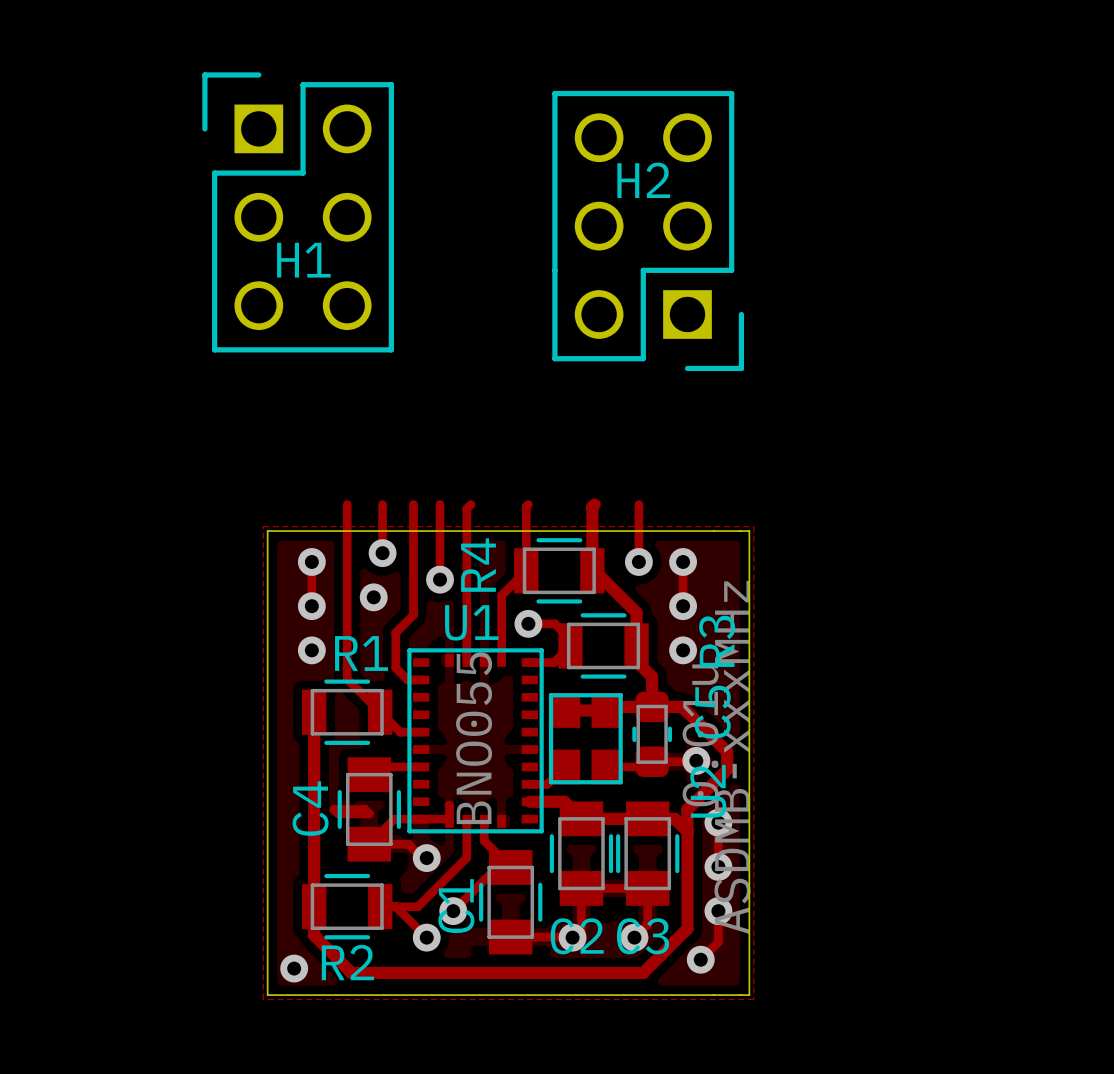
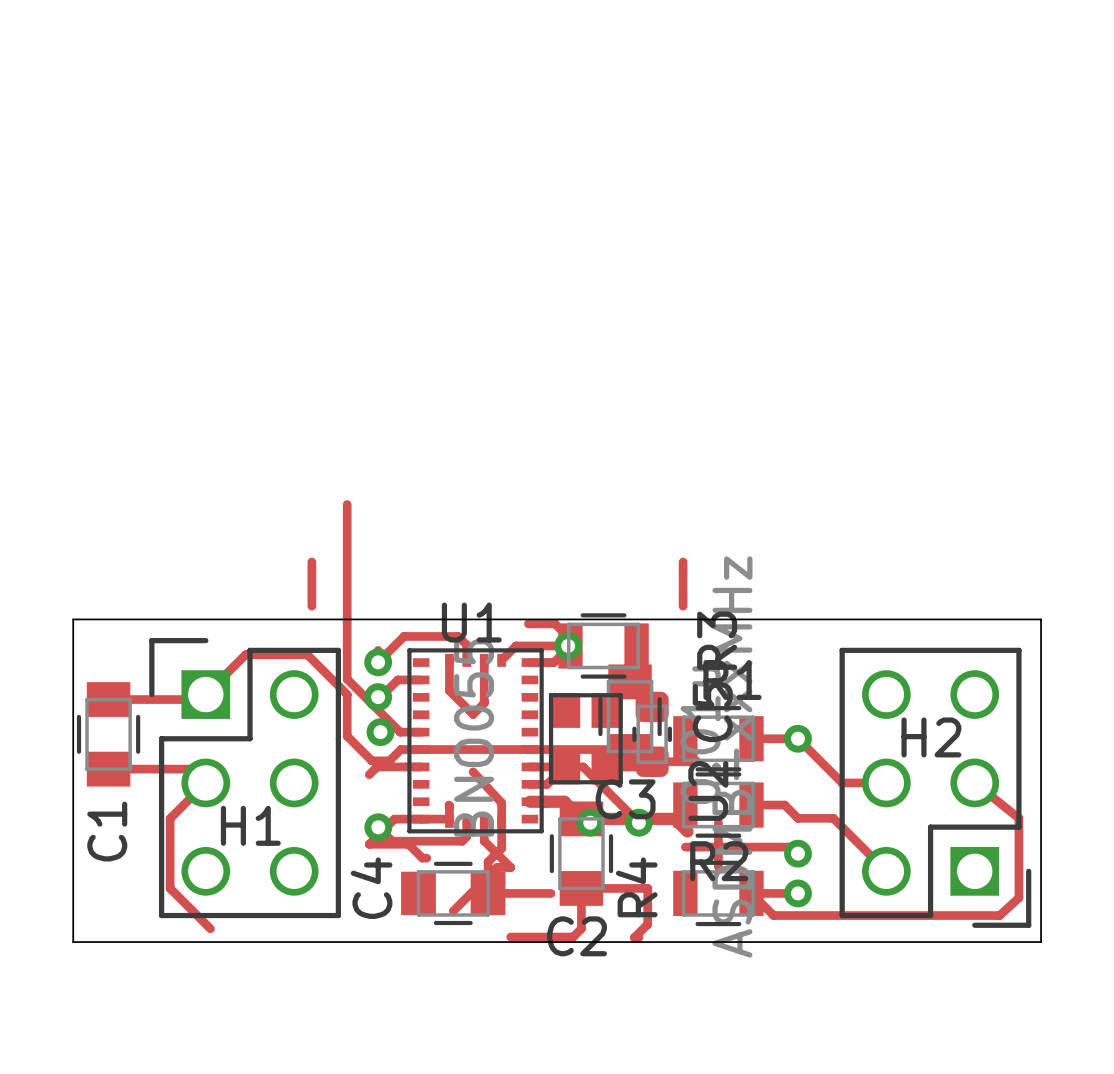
H1 position: (298, 212) -> (245, 778)
H2 position: (648, 230) -> (935, 787)
track: (382, 504) (382, 553) -> none
track: (413, 504) (413, 615) (395, 632) (395, 668) (407, 679) -> (378, 697) (380, 697) (397, 679) (407, 679)
track: (440, 504) (440, 579) -> none
track: (470, 504) (466, 508) (466, 645) -> (378, 650) (378, 662) (404, 636) (458, 636) (466, 645)
track: (528, 504) (526, 506) (526, 570) (501, 595) (501, 660) -> (568, 645) (516, 645) (501, 660)
track: (594, 504) (592, 506) (592, 570) (594, 570) (636, 612) (636, 661) (652, 676) (652, 706) -> none
track: (638, 504) (638, 561) -> none
zone outline: (263, 526) (753, 526) (753, 999) (263, 999) (263, 526) -> none
board edge: (267, 531) (749, 531) (749, 995) (267, 995) (267, 531) -> none
via: (382, 553) -> none
via: (311, 561) -> none
via: (638, 561) -> none
via: (683, 561) -> none
R4 position: (559, 570) -> (718, 893)
via: (440, 579) -> none
via: (373, 597) -> none
via: (311, 606) -> none
via: (683, 606) -> none
board edge: none -> (73, 619) (73, 942) (1041, 942) (1041, 619) (73, 619)
via position: (528, 623) -> (568, 645)
via: (311, 650) -> none
via: (683, 650) -> none
track: none -> (449, 659) (449, 690) (473, 714) (484, 703) (484, 660)
via: none -> (378, 662)
via: none -> (378, 697)
track: none -> (108, 699) (200, 699) (245, 654) (307, 654) (347, 694) (347, 736) (371, 760) (389, 760) (400, 749) (628, 749) (630, 751)
track: (564, 710) (607, 710) (610, 706) (682, 706) (727, 752) (727, 769) (687, 809) (687, 928) (643, 972) (351, 972) (314, 935) (314, 906) -> none
track: (314, 712) (314, 895) -> none
R1 position: (347, 712) -> (718, 738)
via: none -> (380, 732)
track: none -> (751, 738) (797, 738) (842, 782) (886, 782)
via: none -> (797, 738)
via: (696, 760) -> none
track: none -> (108, 765) (108, 769) (191, 769) (205, 782) (170, 818) (170, 888) (210, 928)
track: none -> (529, 766) (583, 766) (638, 822)
track: none -> (473, 771) (501, 802) (501, 848) (488, 861) (488, 893)
track: none -> (974, 782) (1018, 818) (1018, 897) (999, 915) (773, 915) (751, 893) (797, 893)
track: none -> (751, 805) (784, 805) (797, 818) (833, 818) (886, 871)
track: (333, 809) (364, 809) (369, 813) (338, 813) (333, 809) -> none
C4 rotation: 0° (369, 809) -> 90° clockwise (453, 893)
C4 position: (369, 809) -> (453, 893)
via: none -> (590, 822)
via: none -> (638, 822)
via: (718, 822) -> none
via: none -> (378, 827)
track: (466, 836) (466, 857) (417, 906) (380, 906) -> (466, 836) (462, 841) (392, 841) (378, 827)
track: none -> (685, 847) (791, 847) (797, 853)
C3 position: (647, 853) -> (630, 716)
via: none -> (797, 853)
via: (426, 858) -> none
via: (718, 866) -> none
track: none -> (488, 893) (551, 893)
via: none -> (797, 893)
C1 position: (510, 902) -> (108, 734)
R2 position: (347, 906) -> (718, 805)
track: (395, 906) (426, 937) -> none
C1 name position: C1 (456, 906) -> C1 (107, 831)
via: (453, 911) -> none
track: (718, 911) (718, 942) (700, 959) -> none
via: (718, 911) -> none
via: (426, 937) -> none
via: (572, 937) -> none
via: (634, 937) -> none
via: (700, 959) -> none
via: (294, 968) -> none

